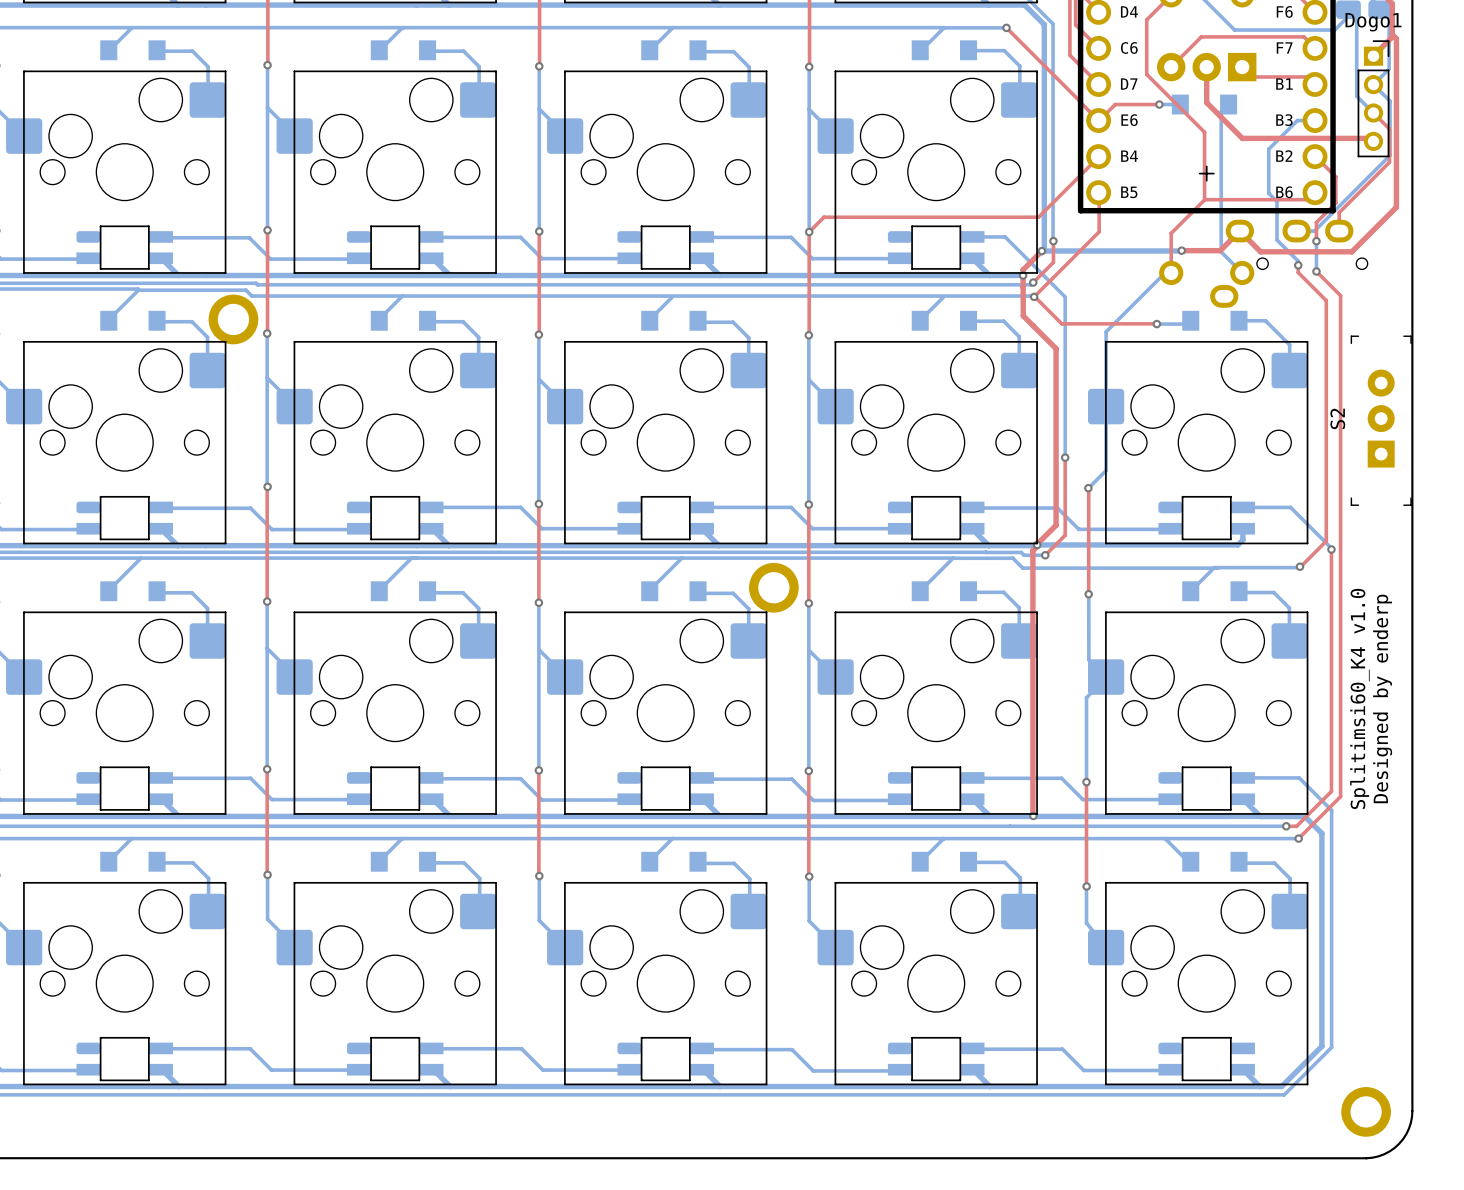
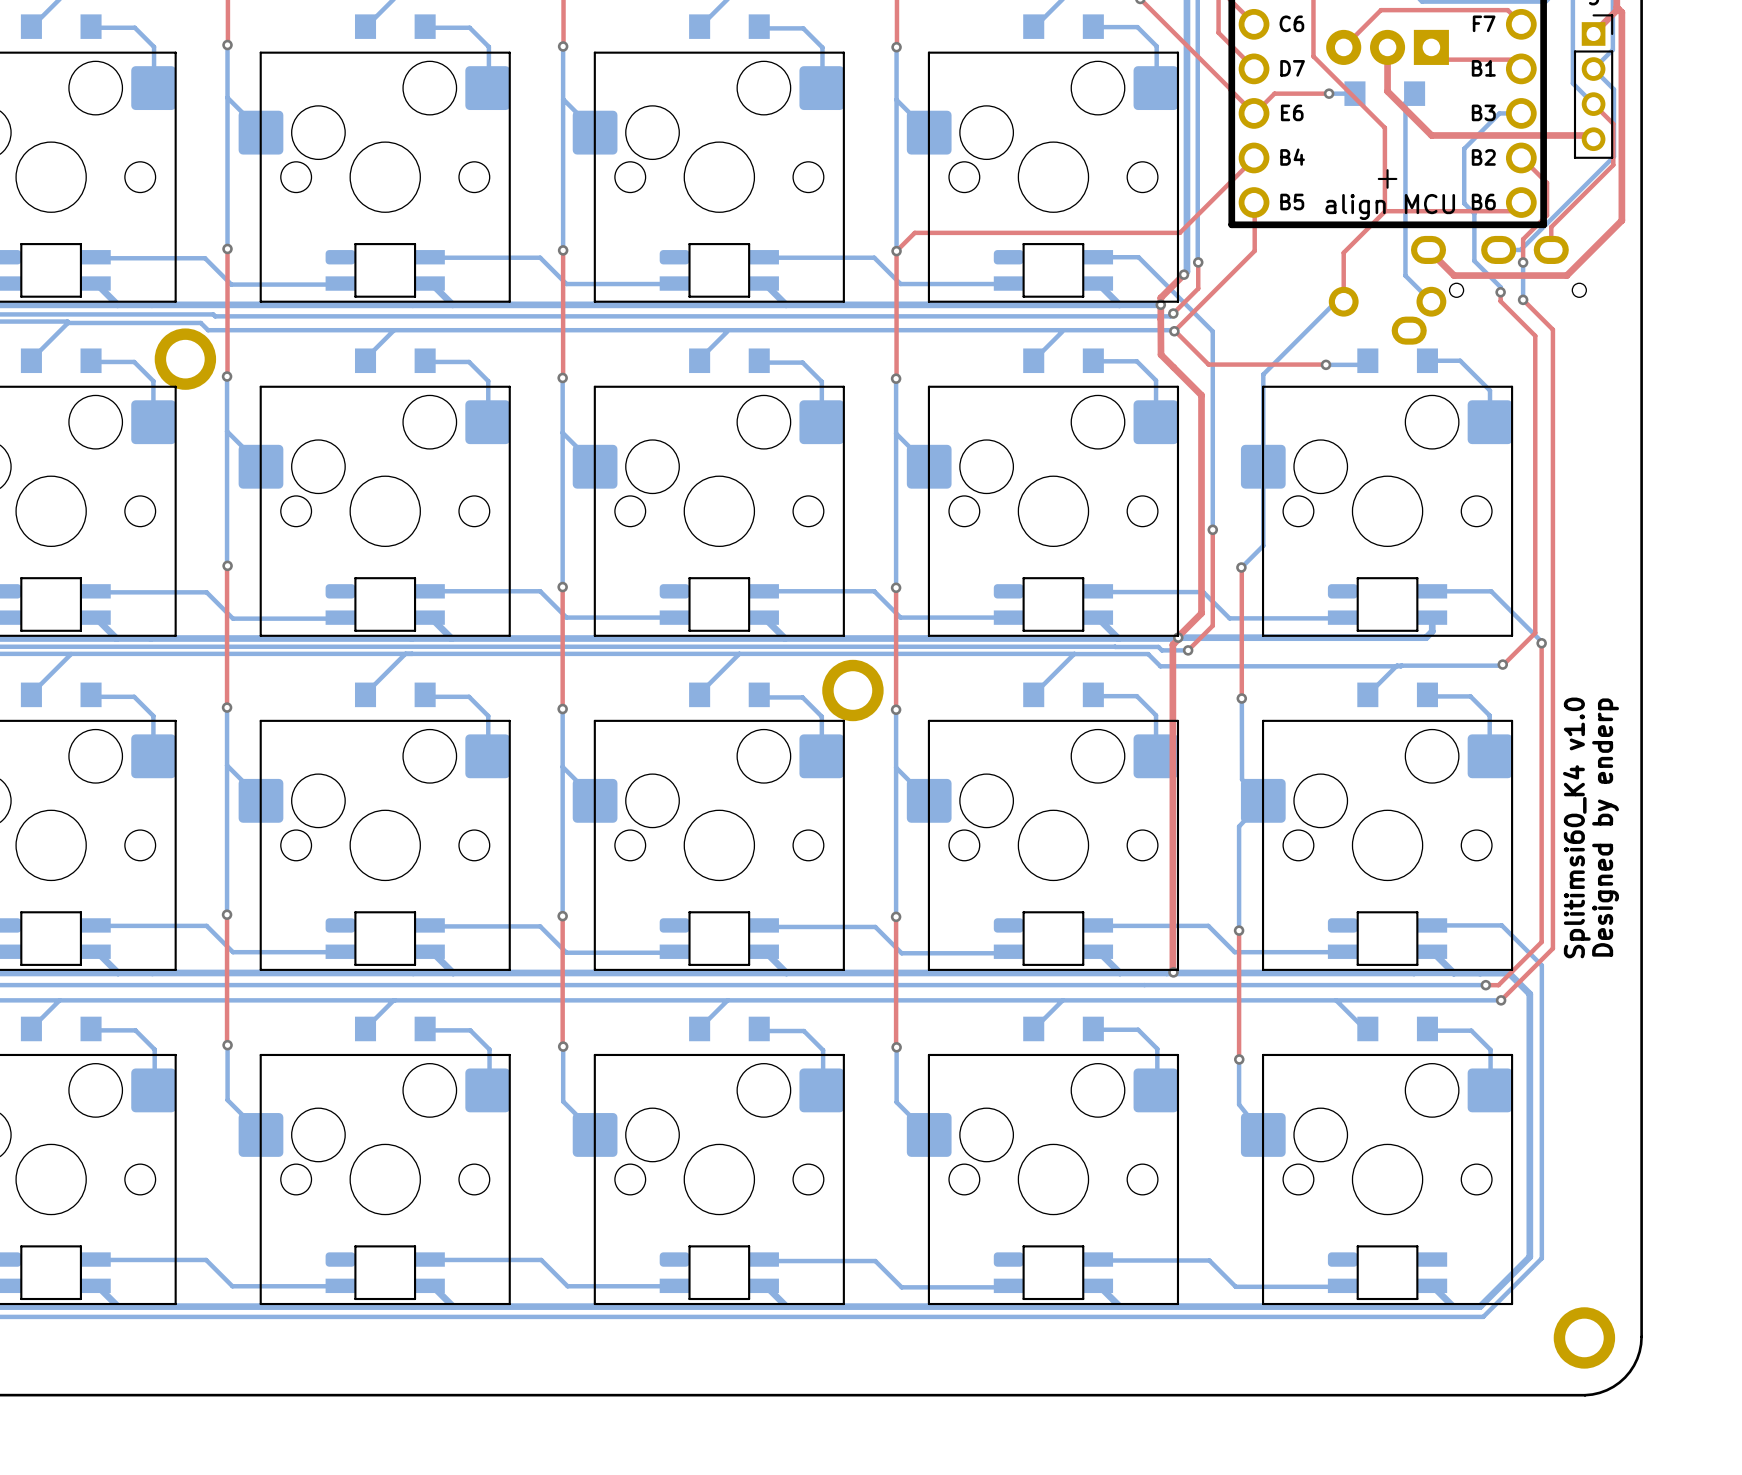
text: none -> align MCU (1390, 206)
top track: (1239, 231) (1220, 250) (1181, 250) -> none
bottom track: (1181, 250) (1041, 250) -> none
via: (1181, 250) -> none
S2: (1381, 420) -> none

